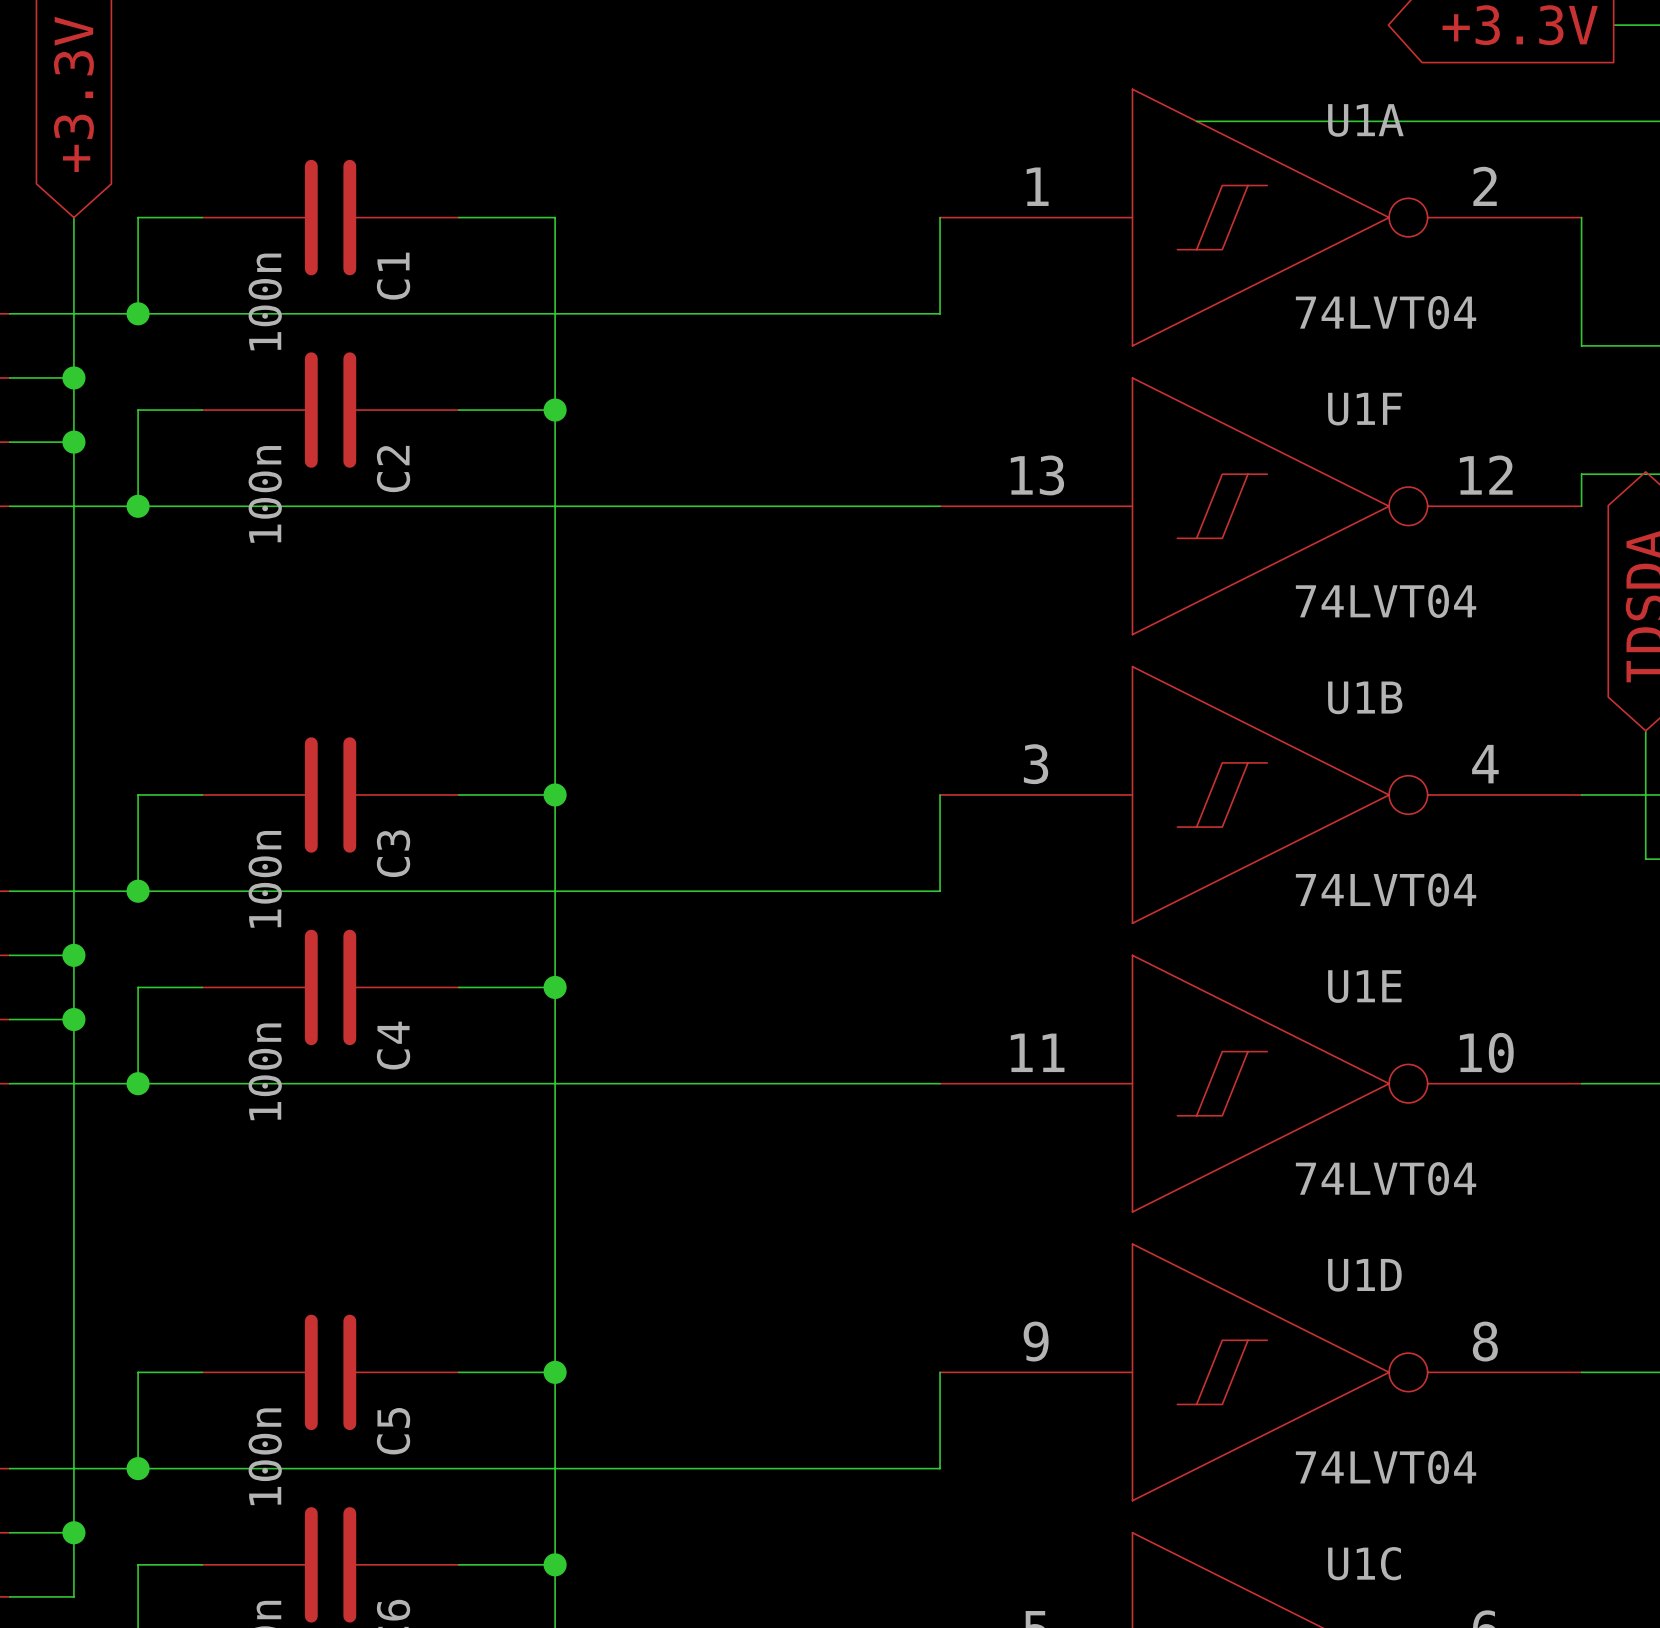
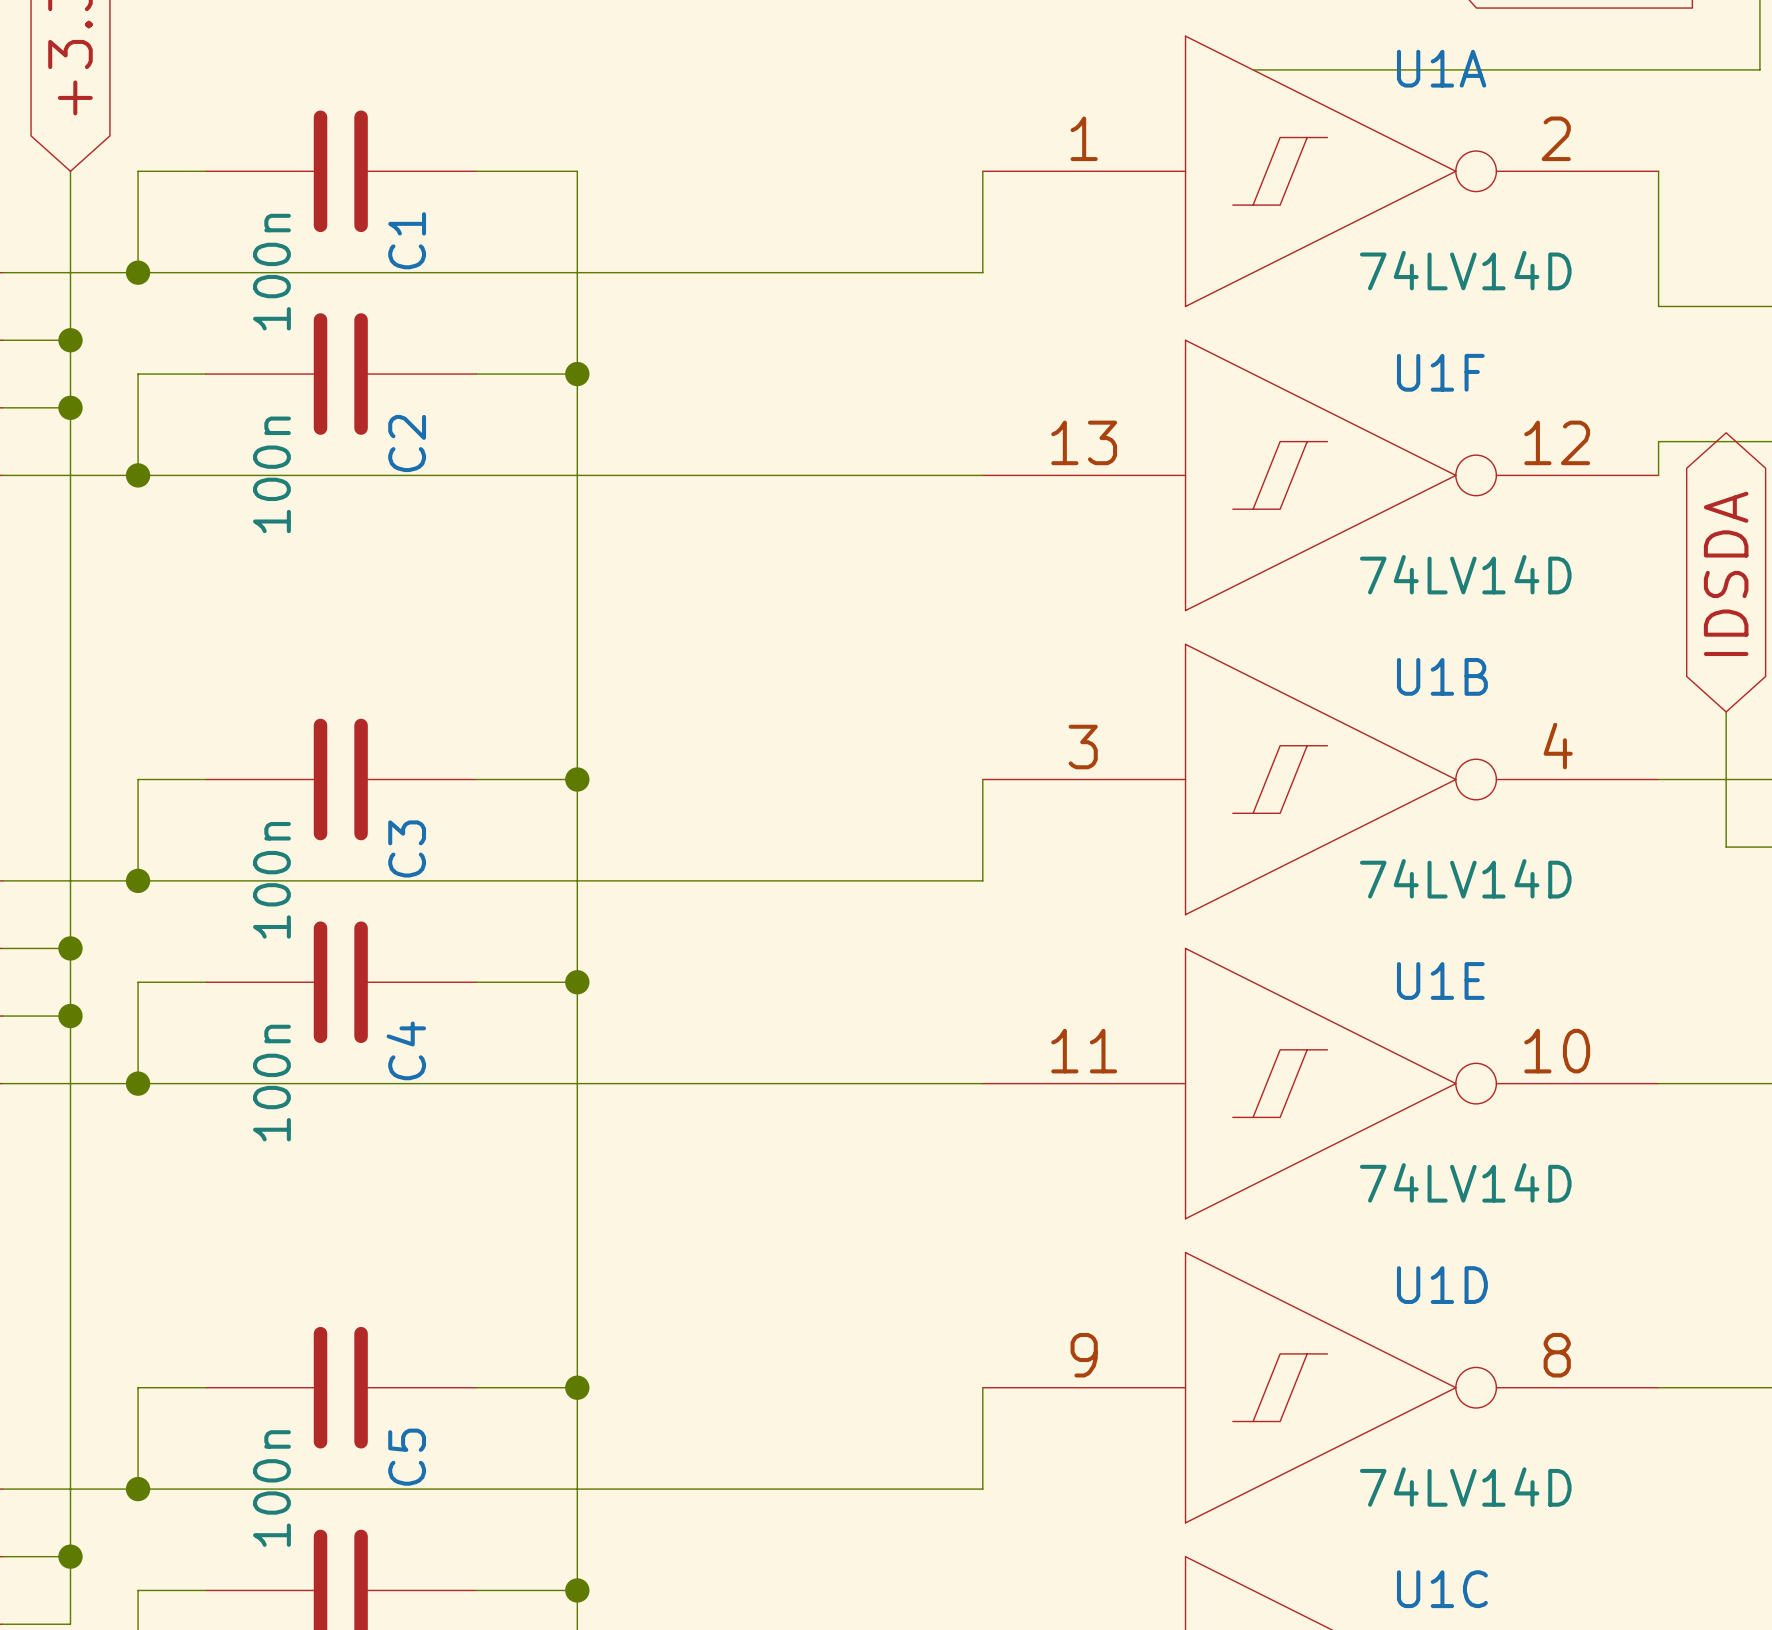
U1A value: 74LVT04 (1386, 312) -> 74LV14D (1465, 270)
U1F value: 74LVT04 (1386, 601) -> 74LV14D (1465, 574)
U1B value: 74LVT04 (1386, 890) -> 74LV14D (1465, 878)
U1E value: 74LVT04 (1386, 1178) -> 74LV14D (1465, 1182)
U1D value: 74LVT04 (1386, 1467) -> 74LV14D (1465, 1487)

